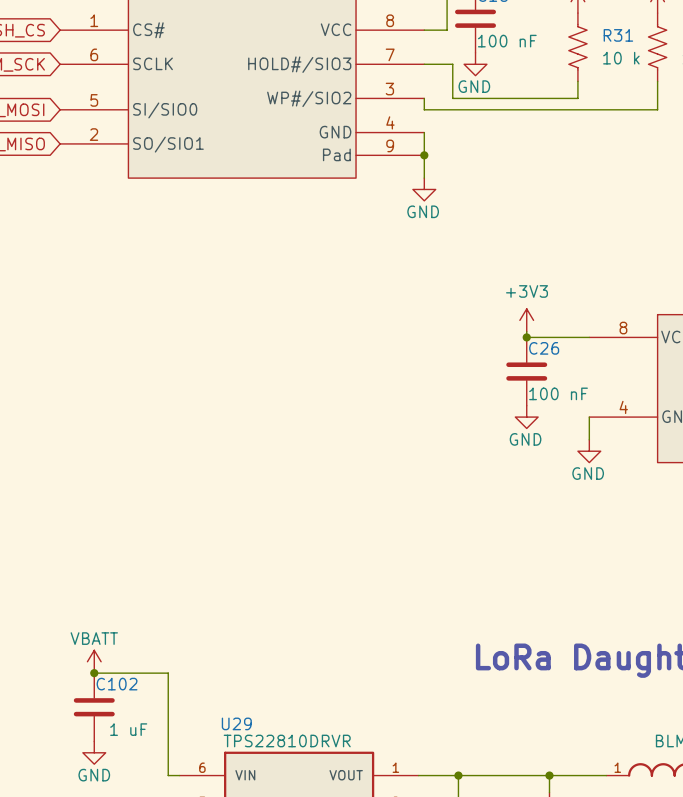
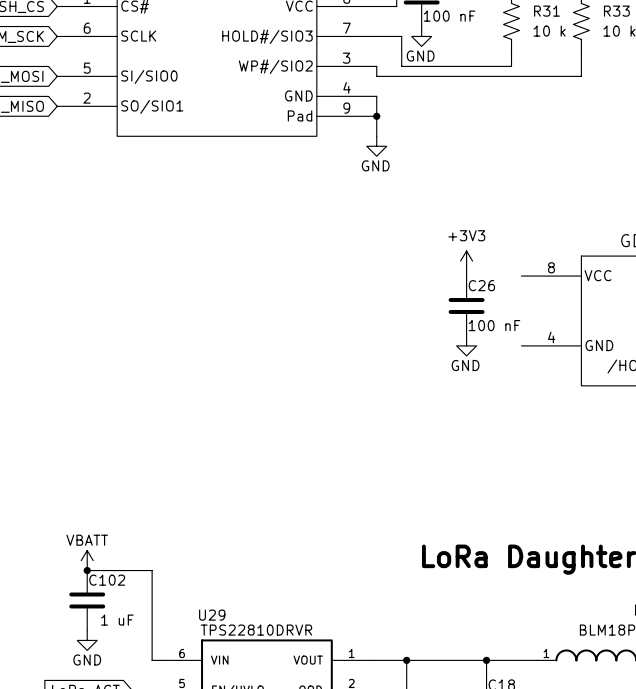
wire: (526, 337) (589, 337) -> none
junction: (526, 337) -> none
wire: (589, 417) (589, 439) -> none
power symbol: GND (589, 451) -> none

